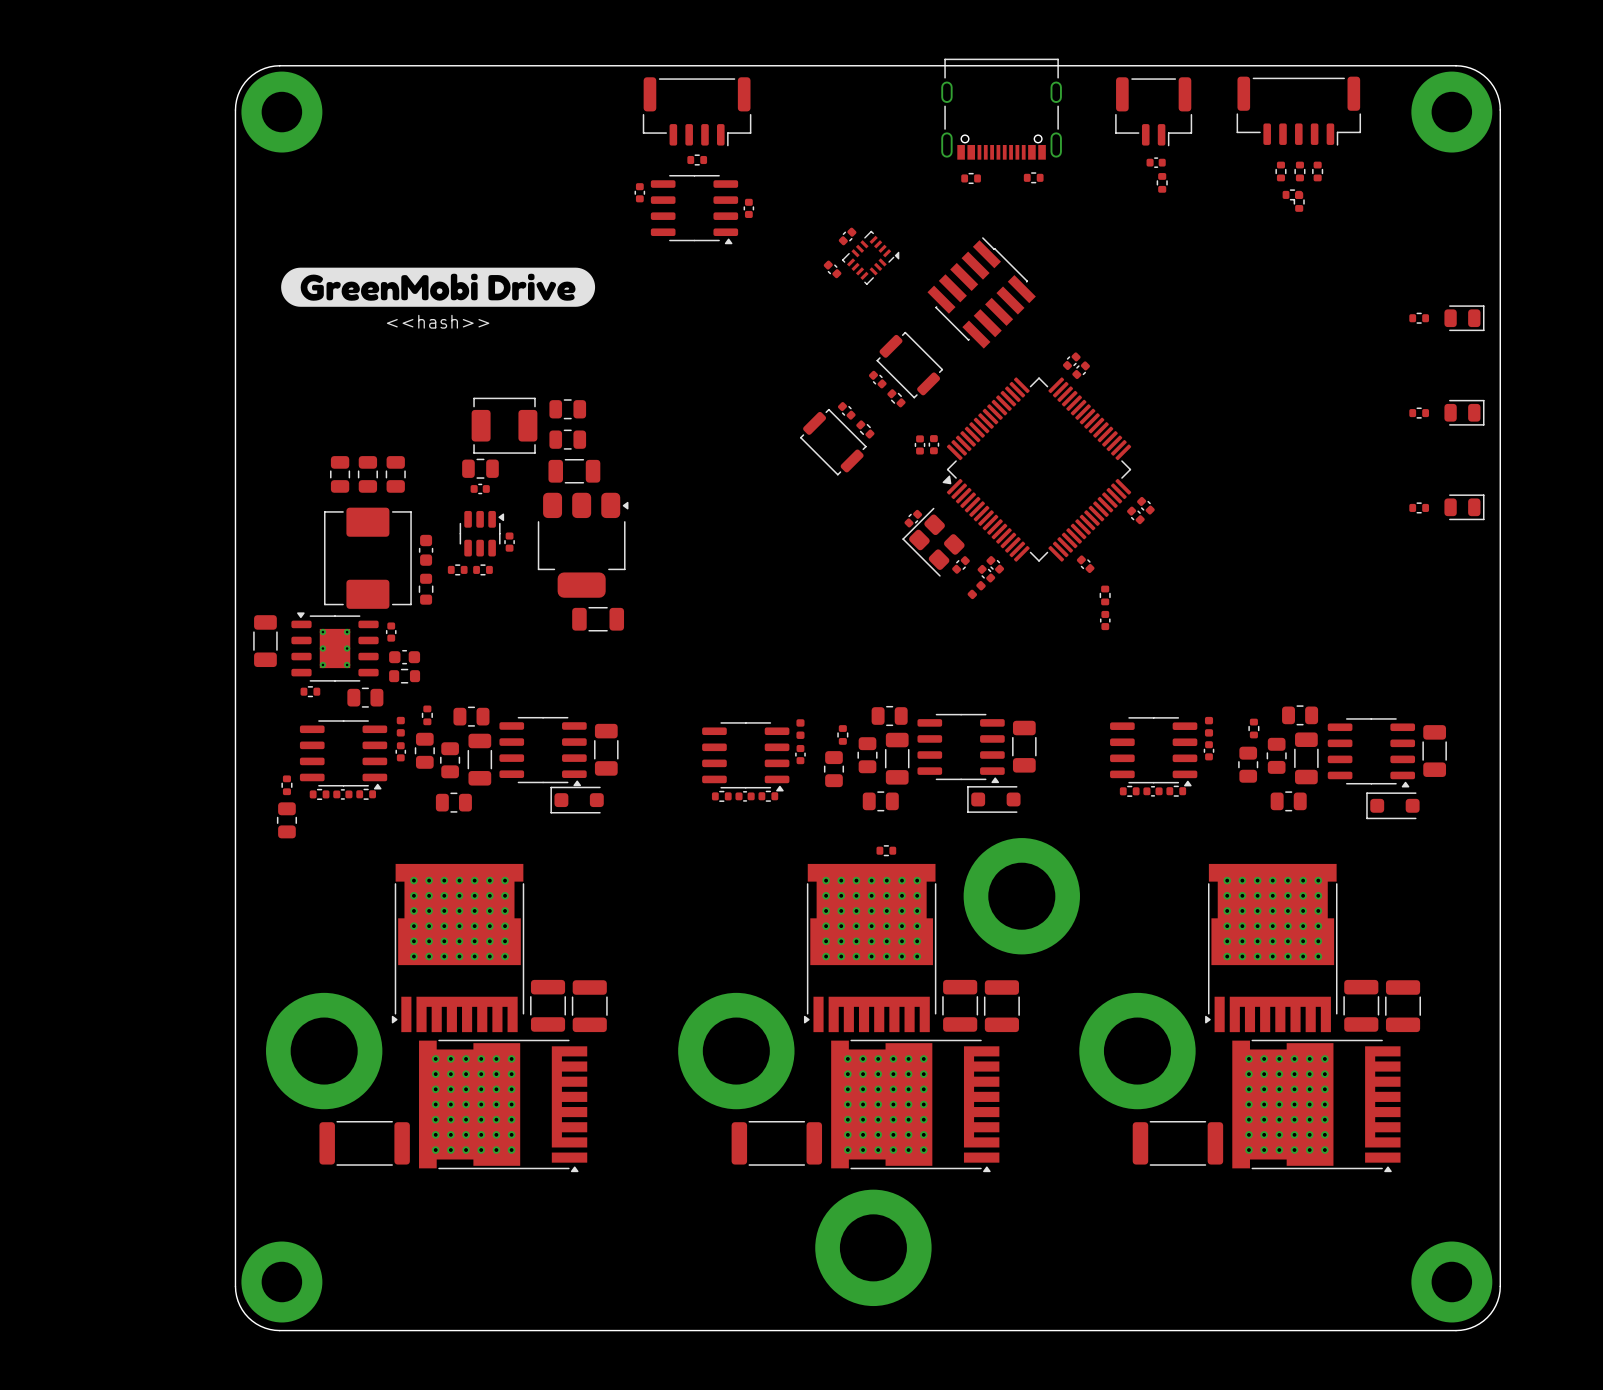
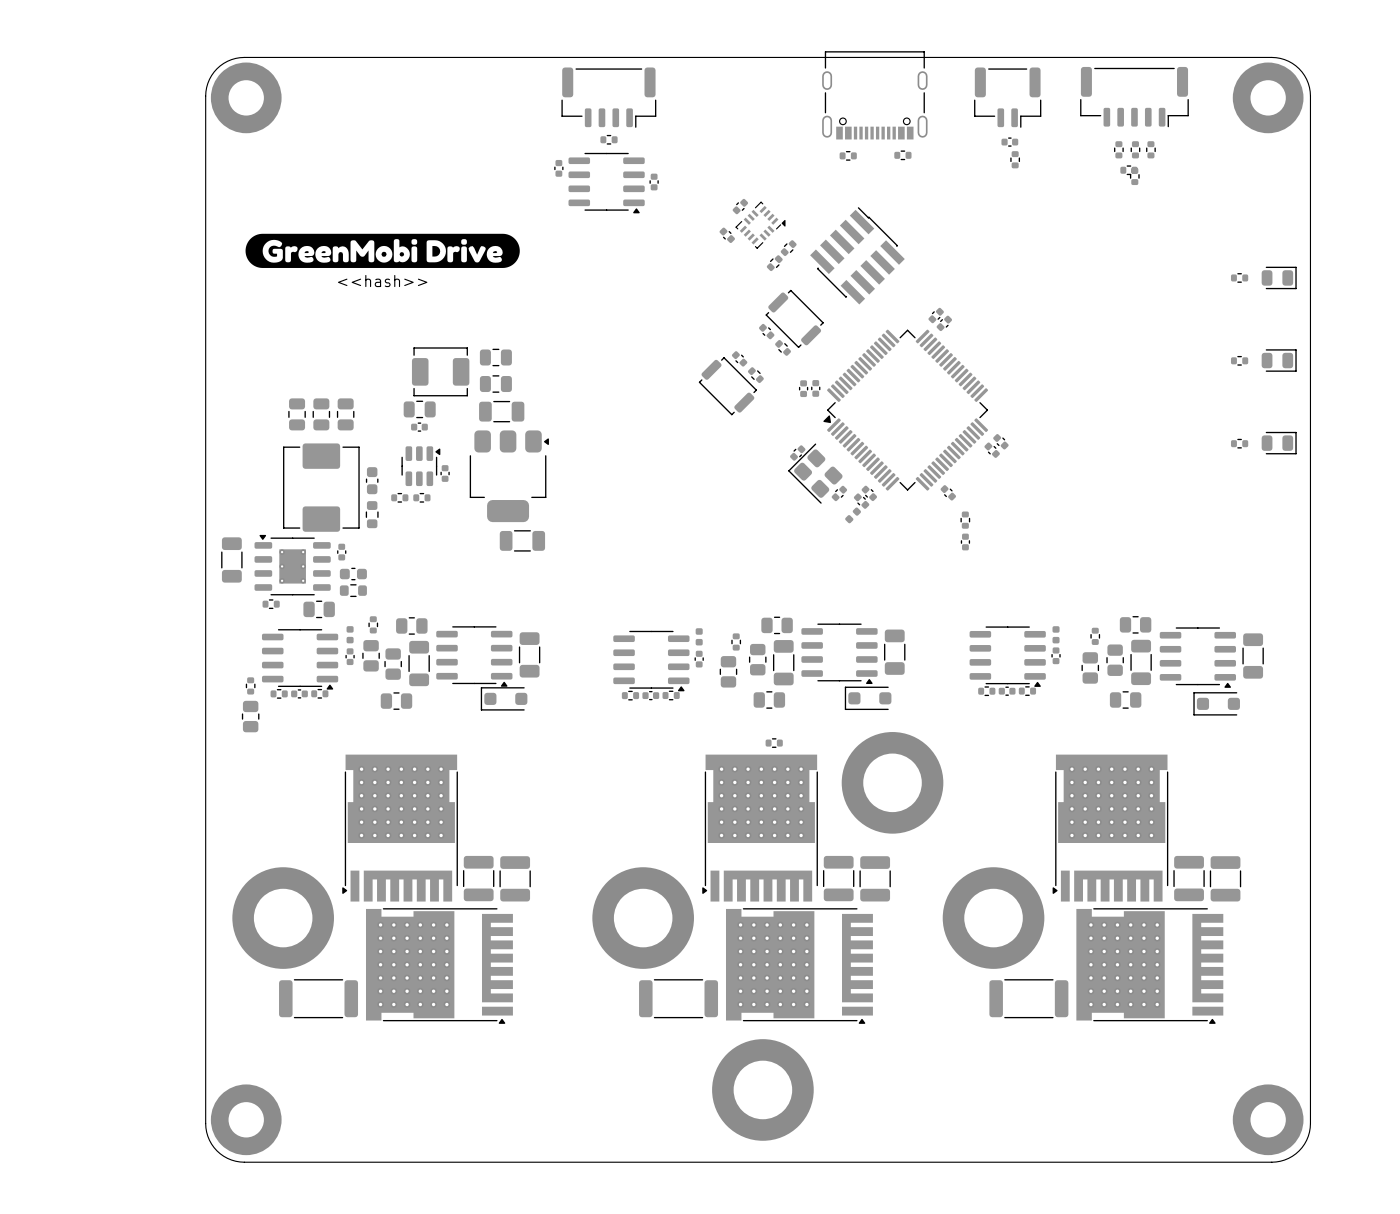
part: none -> (788, 248)
part: none -> (774, 263)

